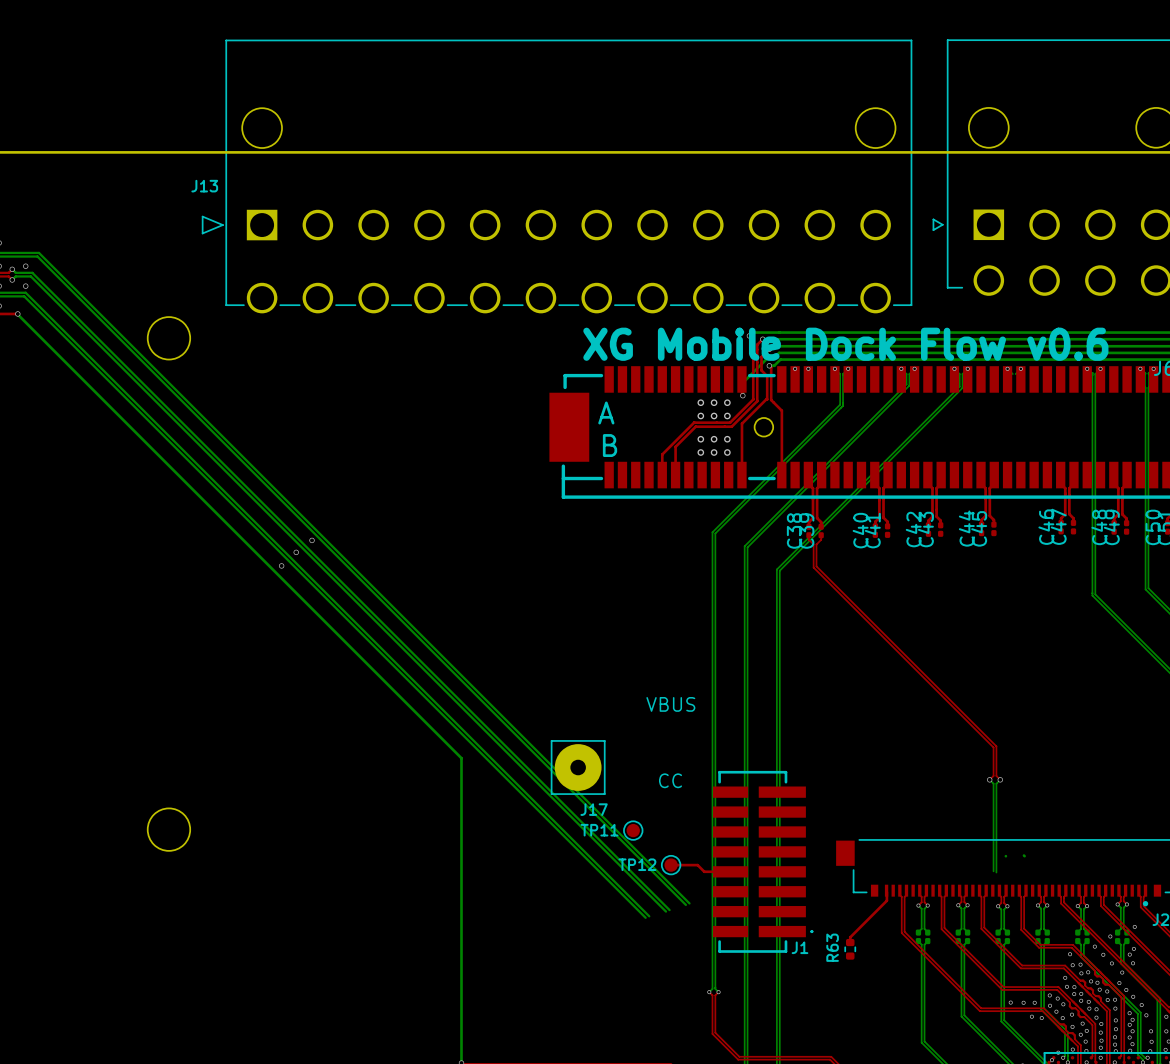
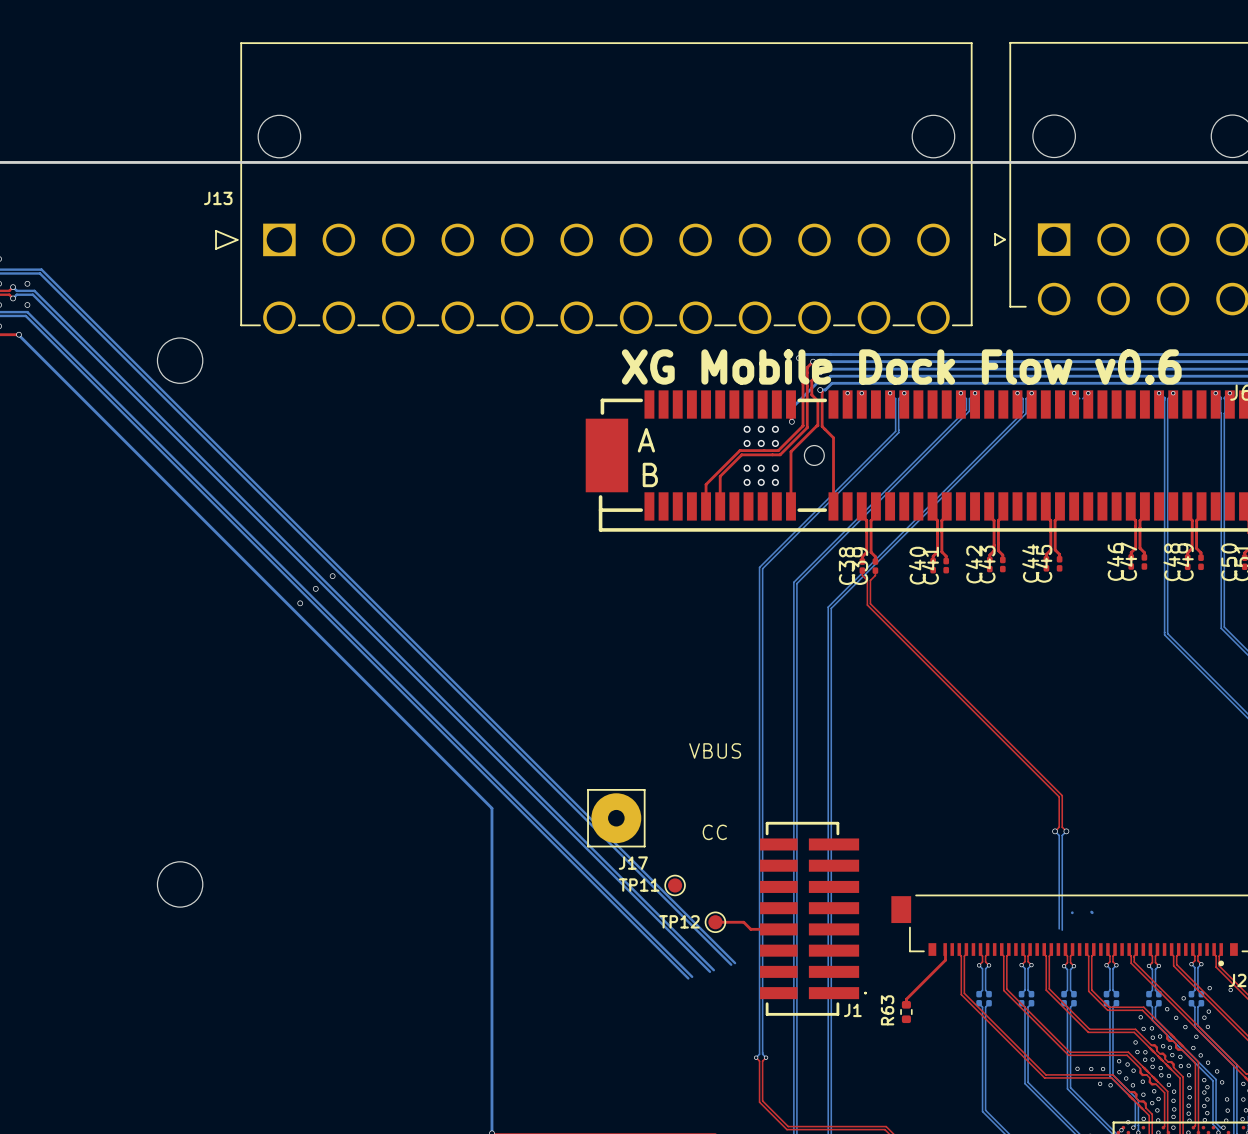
via: none -> (1230, 990)

